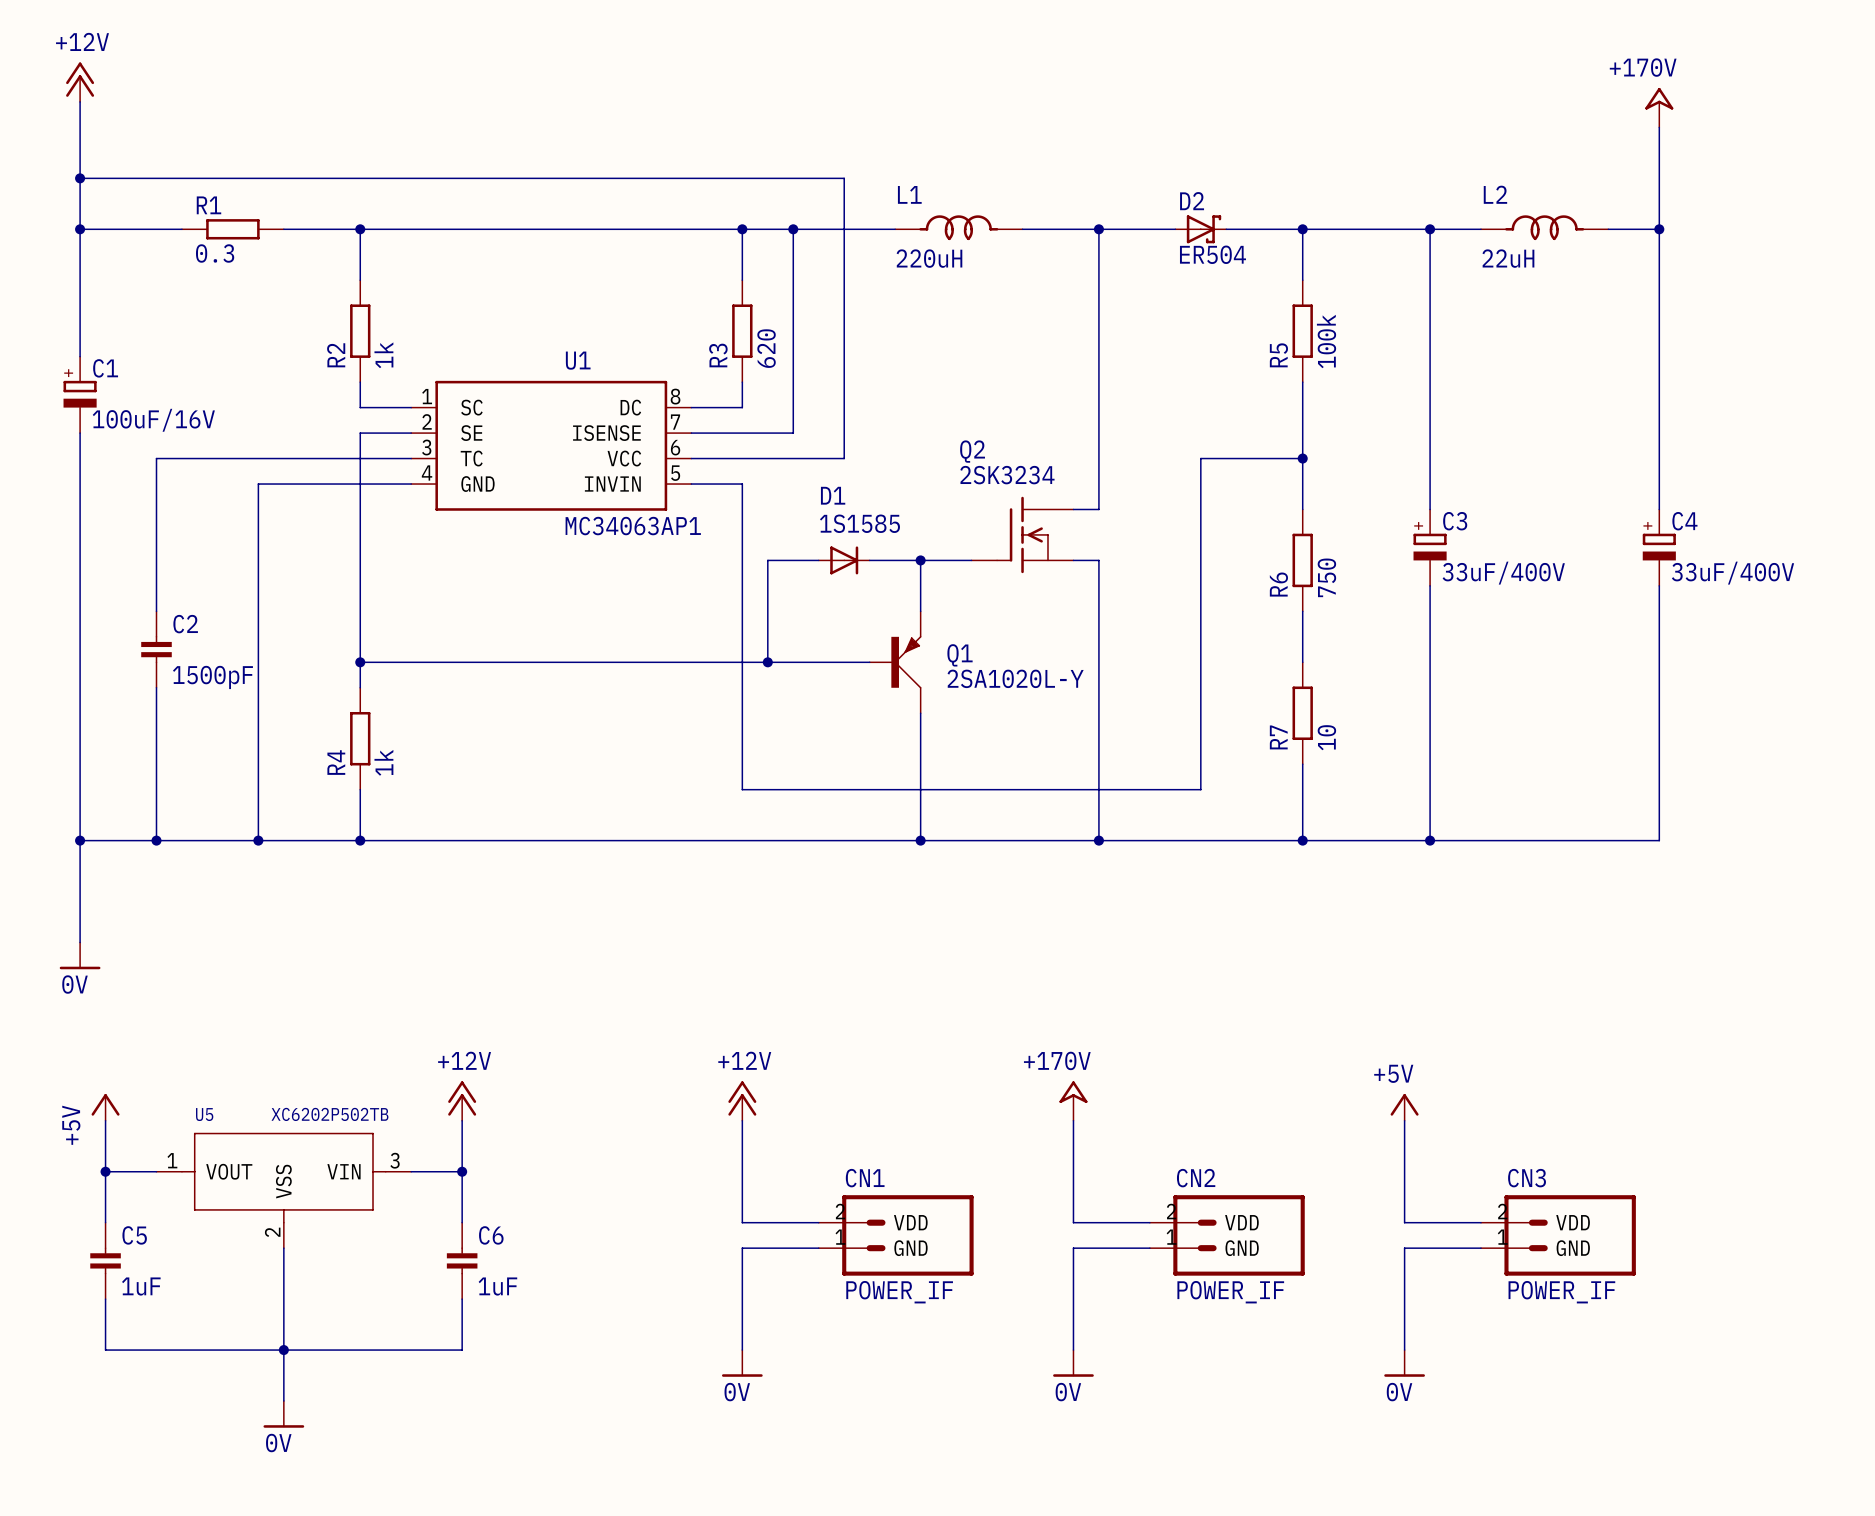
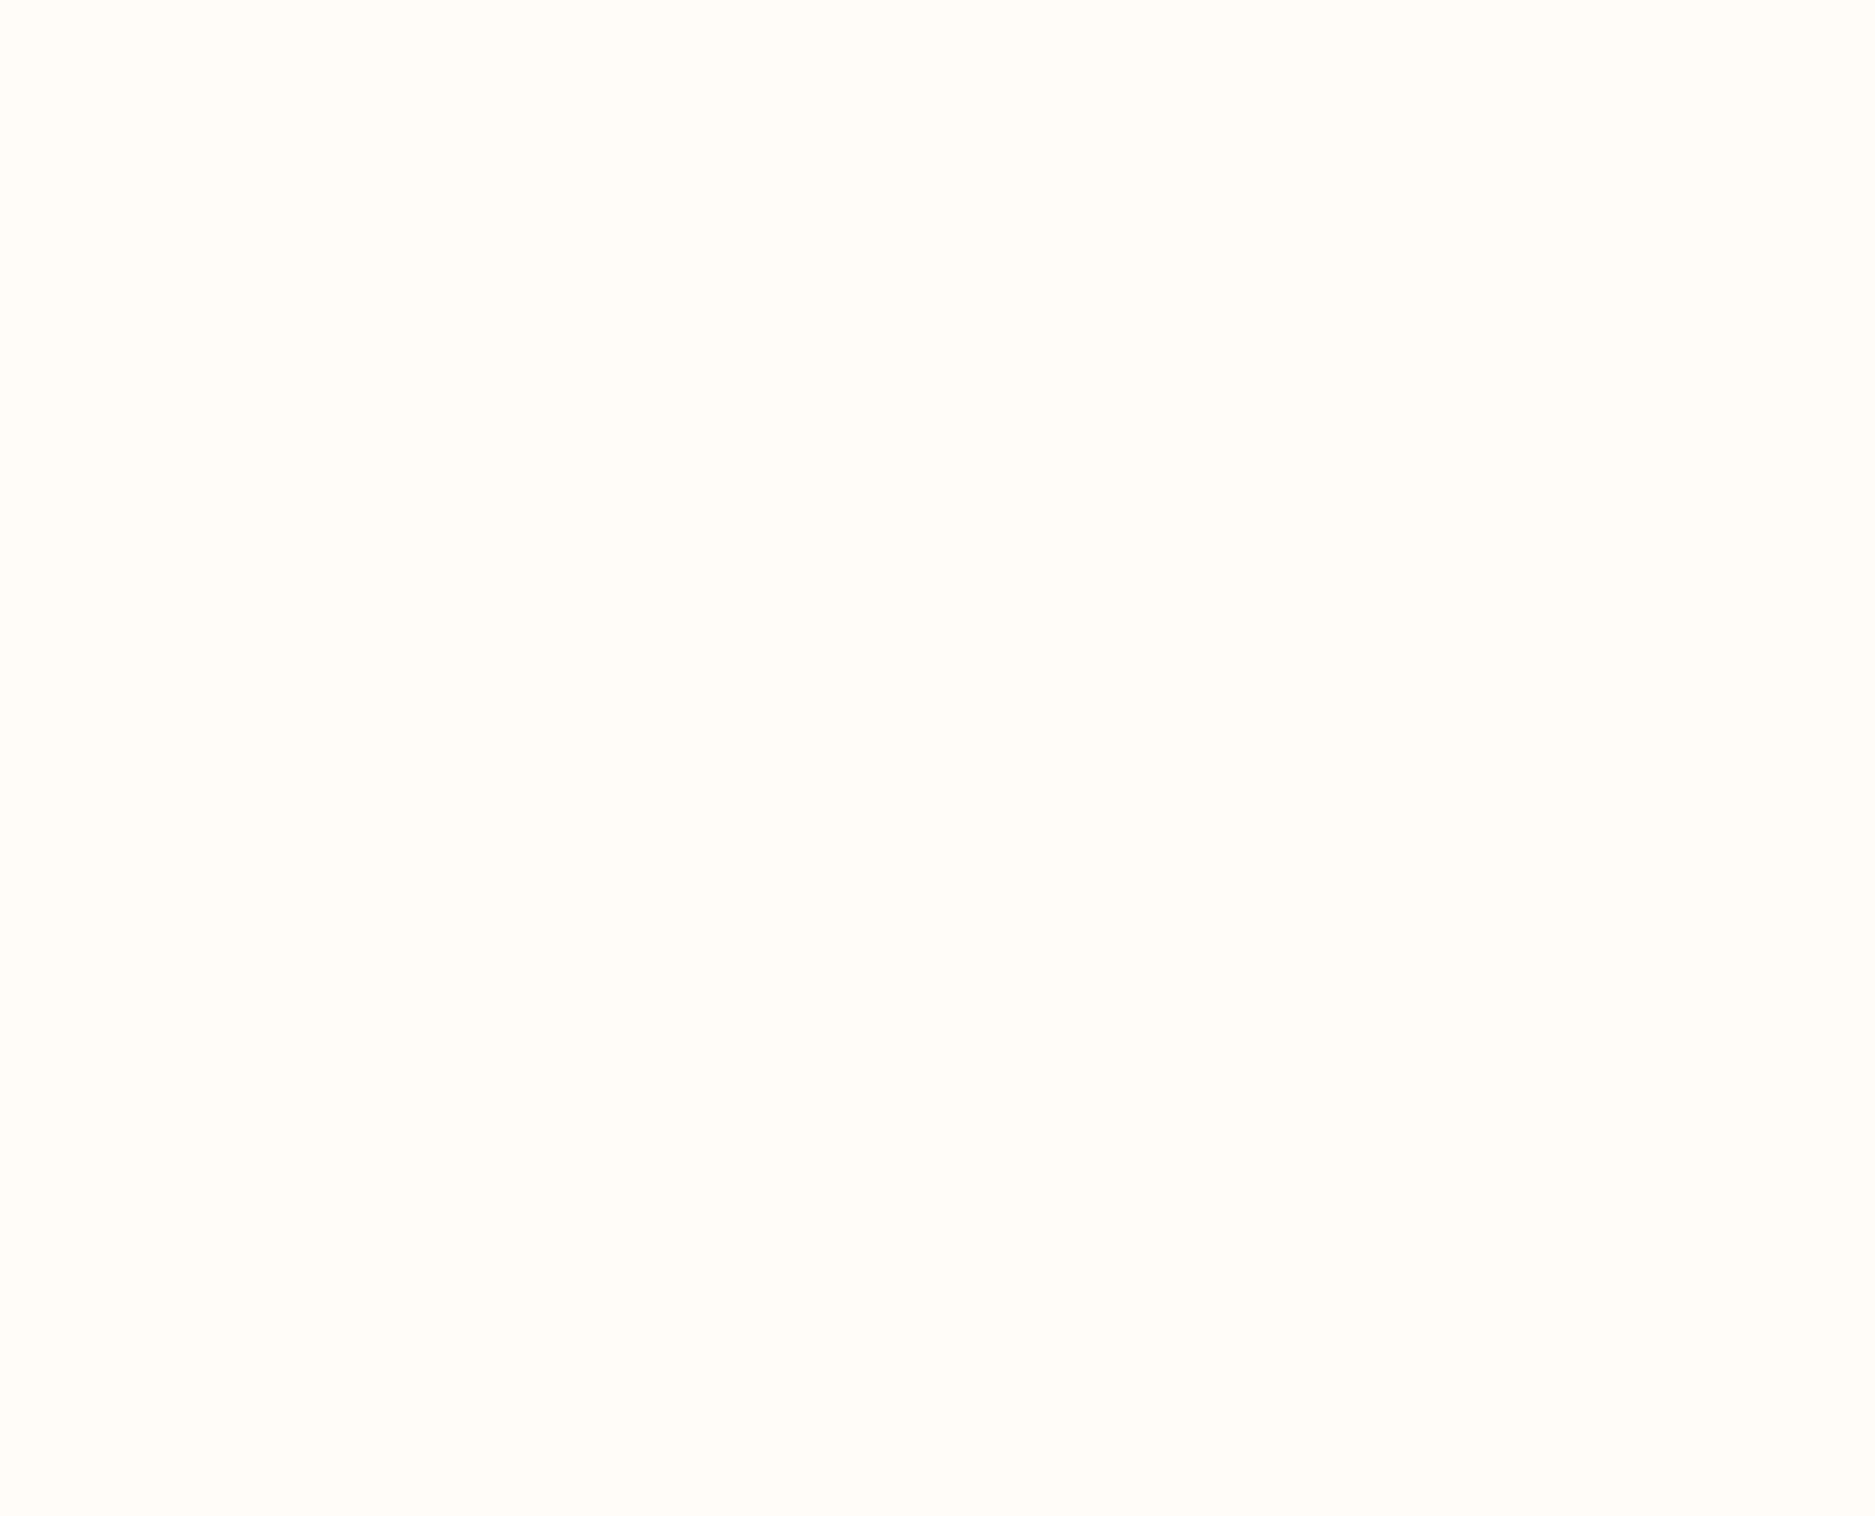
power symbol: +12V (80, 82) -> none
wire: (80, 101) (80, 356) -> none
power symbol: +170V (1659, 107) -> none
wire: (1659, 127) (1659, 509) -> none
wire: (80, 178) (844, 178) (844, 458) (691, 458) -> none
junction: (80, 178) -> none
L1: 220uH (958, 227) -> none
L2: 22uH (1544, 227) -> none
wire: (80, 229) (181, 229) -> none
junction: (80, 229) -> none
R1: 0.3 (232, 229) -> none
wire: (283, 229) (895, 229) -> none
wire: (360, 229) (360, 280) -> none
junction: (360, 229) -> none
wire: (742, 229) (742, 280) -> none
junction: (742, 229) -> none
wire: (793, 229) (793, 433) (691, 433) -> none
junction: (793, 229) -> none
wire: (1022, 229) (1175, 229) -> none
wire: (1098, 229) (1098, 509) (1073, 509) -> none
junction: (1098, 229) -> none
D2: ER504 (1200, 229) -> none
wire: (1226, 229) (1481, 229) -> none
wire: (1302, 229) (1302, 280) -> none
junction: (1302, 229) -> none
wire: (1430, 229) (1430, 509) -> none
junction: (1430, 229) -> none
wire: (1608, 229) (1659, 229) -> none
junction: (1659, 229) -> none
R2: 1k (360, 331) -> none
R3: 620 (742, 331) -> none
R5: 100k (1302, 331) -> none
wire: (360, 382) (360, 407) (411, 407) -> none
wire: (742, 382) (742, 407) (691, 407) -> none
wire: (1302, 382) (1302, 509) -> none
C1: 100uF/16V (80, 394) -> none
wire: (80, 433) (80, 942) -> none
wire: (411, 433) (360, 433) (360, 687) -> none
U1: MC34063AP1 (551, 445) -> none
wire: (411, 458) (156, 458) (156, 611) -> none
wire: (1302, 458) (1200, 458) (1200, 789) (742, 789) (742, 484) (691, 484) -> none
junction: (1302, 458) -> none
wire: (411, 484) (258, 484) (258, 840) -> none
Q2: 2SK3234 (1022, 534) -> none
C3: 33uF/400V (1430, 547) -> none
C4: 33uF/400V (1659, 547) -> none
wire: (818, 560) (767, 560) (767, 662) -> none
D1: 1S1585 (844, 560) -> none
wire: (869, 560) (971, 560) -> none
wire: (920, 560) (920, 611) -> none
junction: (920, 560) -> none
wire: (1073, 560) (1098, 560) (1098, 840) -> none
R6: 750 (1302, 560) -> none
wire: (1430, 585) (1430, 840) -> none
wire: (1659, 585) (1659, 840) (80, 840) -> none
wire: (1302, 611) (1302, 662) -> none
C2: 1500pF (156, 649) -> none
wire: (360, 662) (869, 662) -> none
junction: (360, 662) -> none
junction: (767, 662) -> none
Q1: 2SA1020L-Y (895, 662) -> none
wire: (156, 687) (156, 840) -> none
wire: (920, 713) (920, 840) -> none
R7: 10 (1302, 713) -> none
R4: 1k (360, 738) -> none
wire: (1302, 764) (1302, 840) -> none
wire: (360, 789) (360, 840) -> none
junction: (80, 840) -> none
junction: (156, 840) -> none
junction: (258, 840) -> none
junction: (360, 840) -> none
junction: (920, 840) -> none
junction: (1098, 840) -> none
junction: (1302, 840) -> none
junction: (1430, 840) -> none
power symbol: 0V (80, 955) -> none
power symbol: +12V (462, 1101) -> none
power symbol: +12V (742, 1101) -> none
power symbol: +170V (1073, 1101) -> none
power symbol: +5V (105, 1107) -> none
power symbol: +5V (1404, 1107) -> none
wire: (105, 1120) (105, 1222) -> none
wire: (462, 1120) (462, 1222) -> none
wire: (742, 1120) (742, 1222) (818, 1222) -> none
wire: (1073, 1120) (1073, 1222) (1149, 1222) -> none
wire: (1404, 1120) (1404, 1222) (1481, 1222) -> none
wire: (105, 1171) (156, 1171) -> none
junction: (105, 1171) -> none
wire: (411, 1171) (462, 1171) -> none
junction: (462, 1171) -> none
U5: XC6202P502TB (283, 1190) -> none
CN1: POWER_IF (896, 1235) -> none
CN2: POWER_IF (1227, 1235) -> none
CN3: POWER_IF (1558, 1235) -> none
wire: (283, 1248) (283, 1400) -> none
wire: (818, 1248) (742, 1248) (742, 1350) -> none
wire: (1149, 1248) (1073, 1248) (1073, 1350) -> none
wire: (1481, 1248) (1404, 1248) (1404, 1350) -> none
C5: 1uF (105, 1260) -> none
C6: 1uF (462, 1260) -> none
wire: (105, 1299) (105, 1350) (462, 1350) (462, 1299) -> none
junction: (283, 1350) -> none
power symbol: 0V (742, 1363) -> none
power symbol: 0V (1073, 1363) -> none
power symbol: 0V (1404, 1363) -> none
power symbol: 0V (283, 1414) -> none

